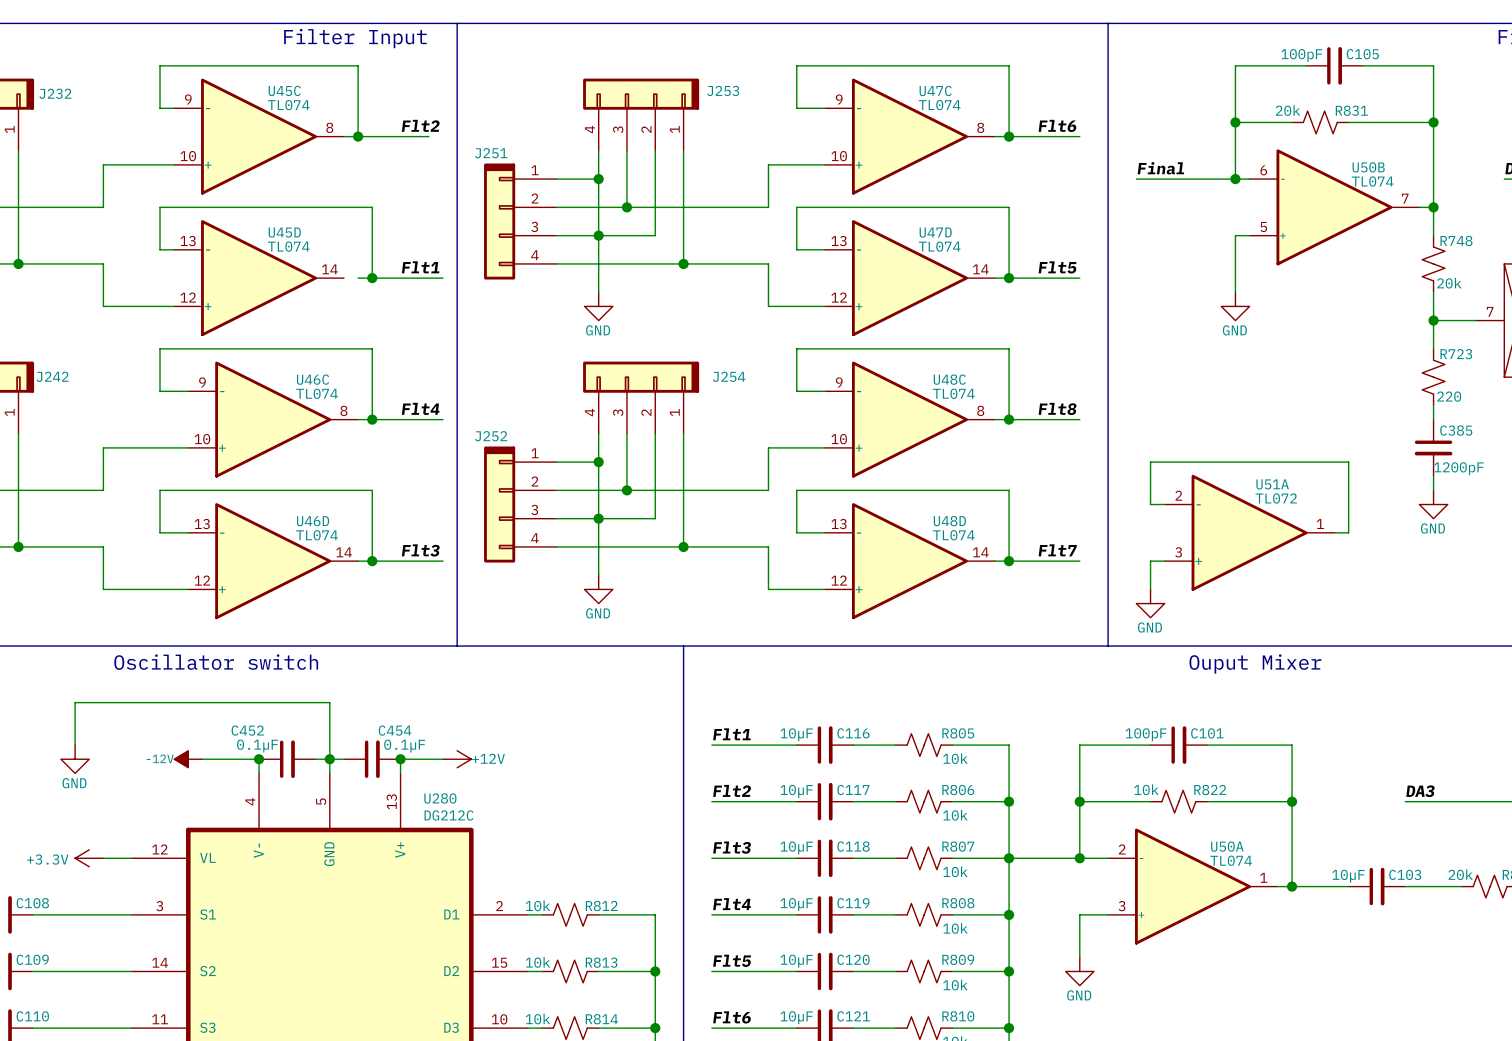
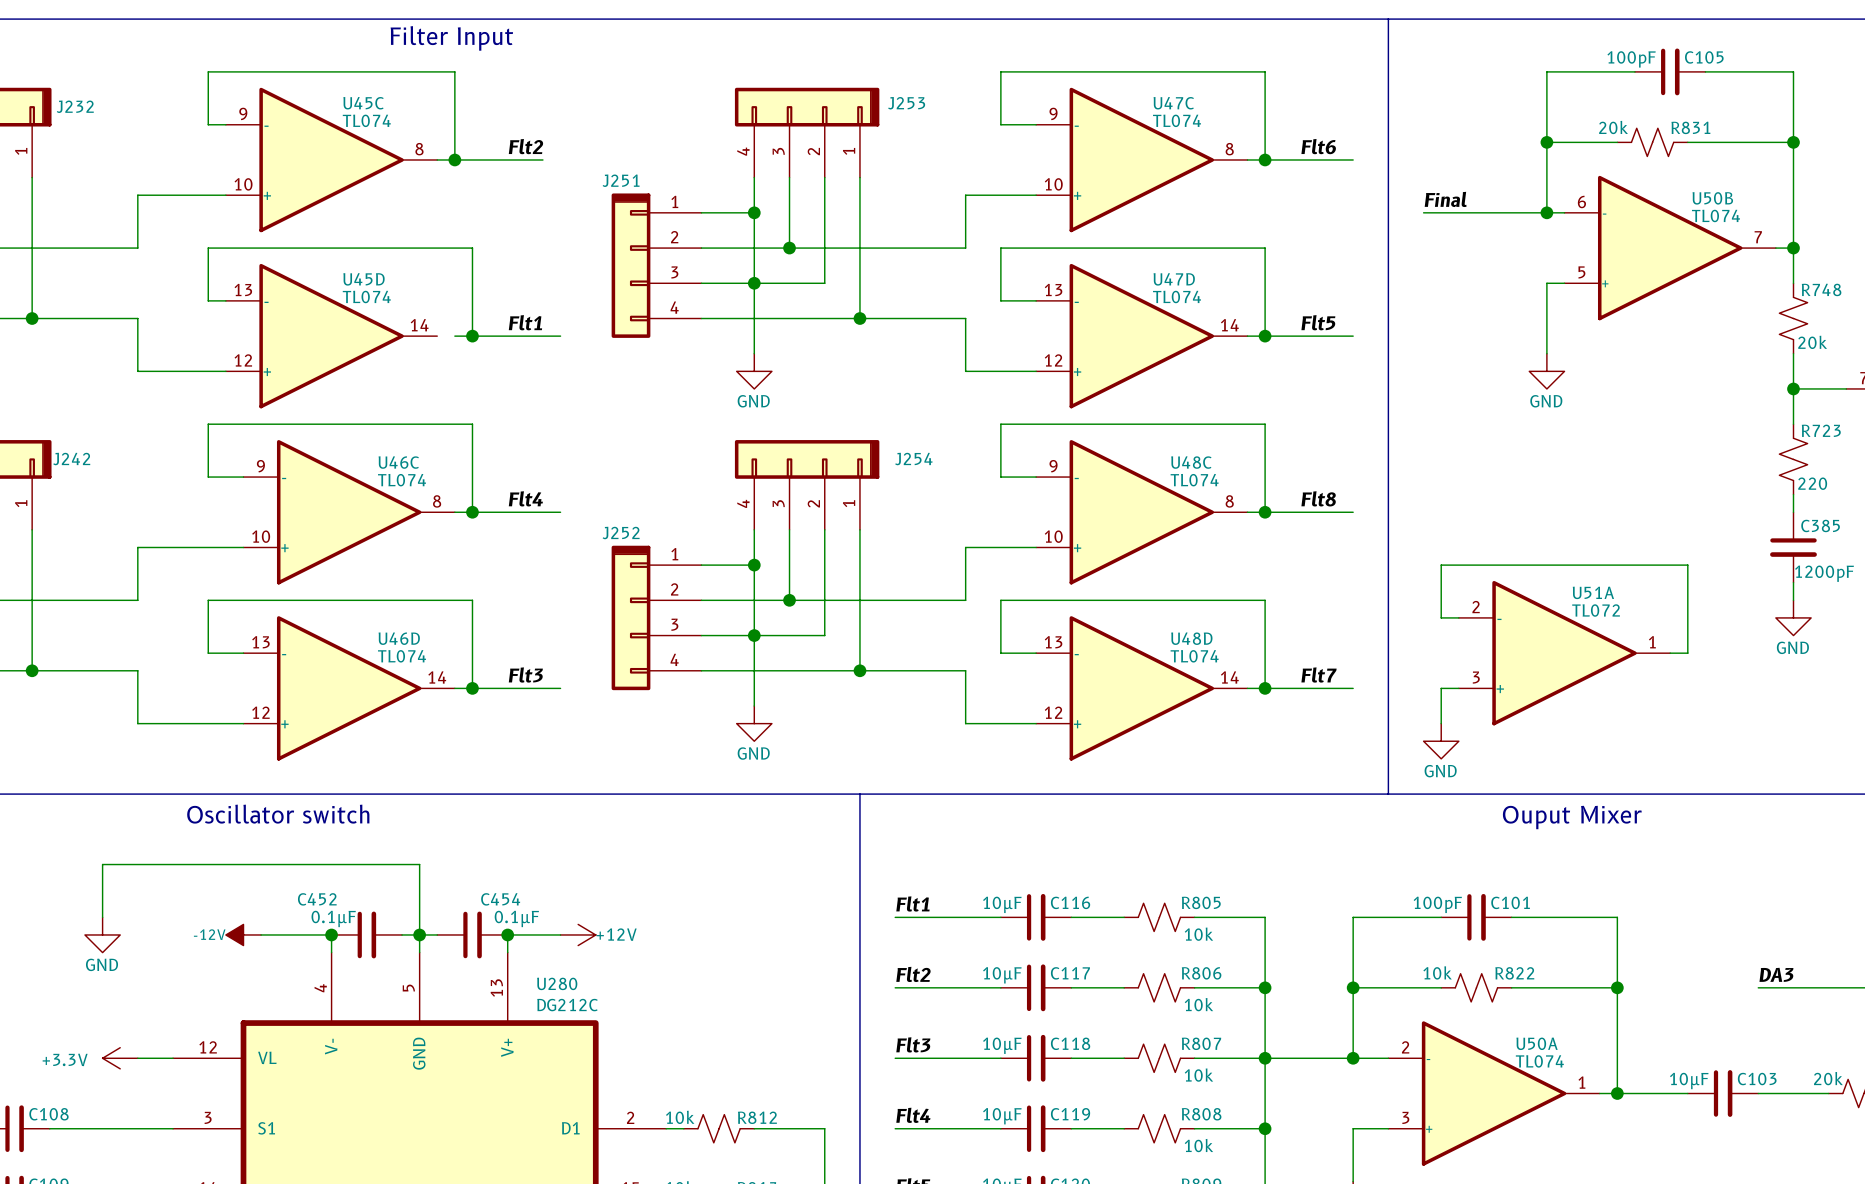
line: (457, 23) (457, 646) -> none

